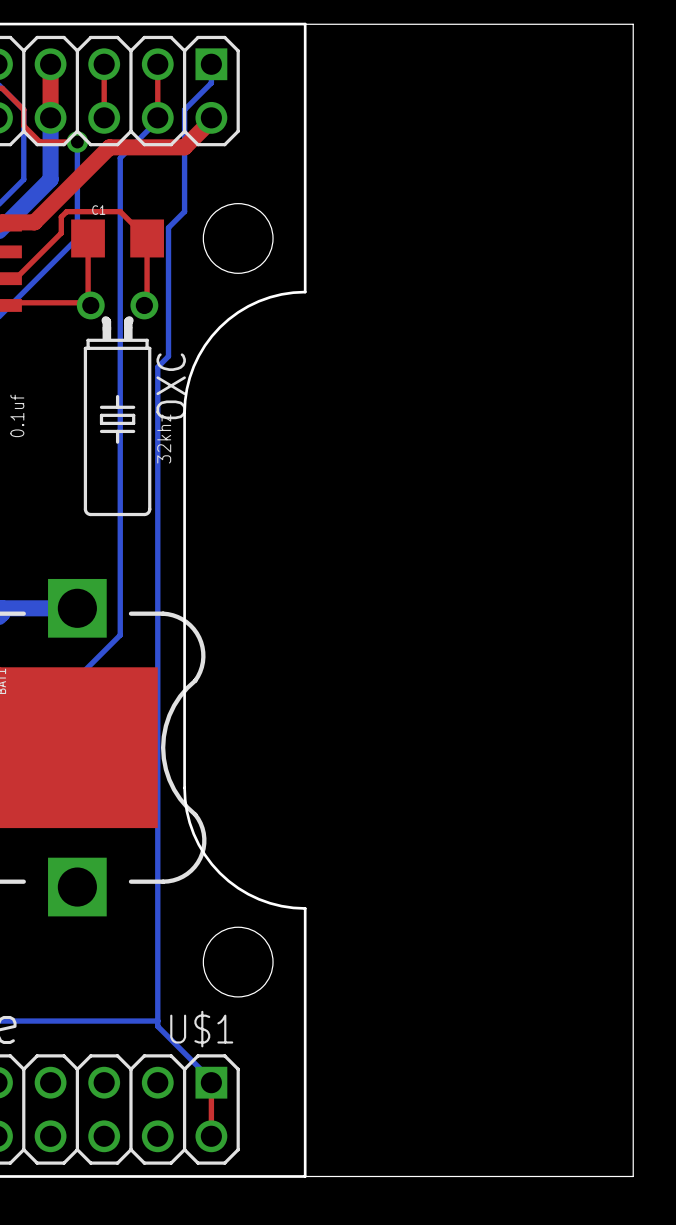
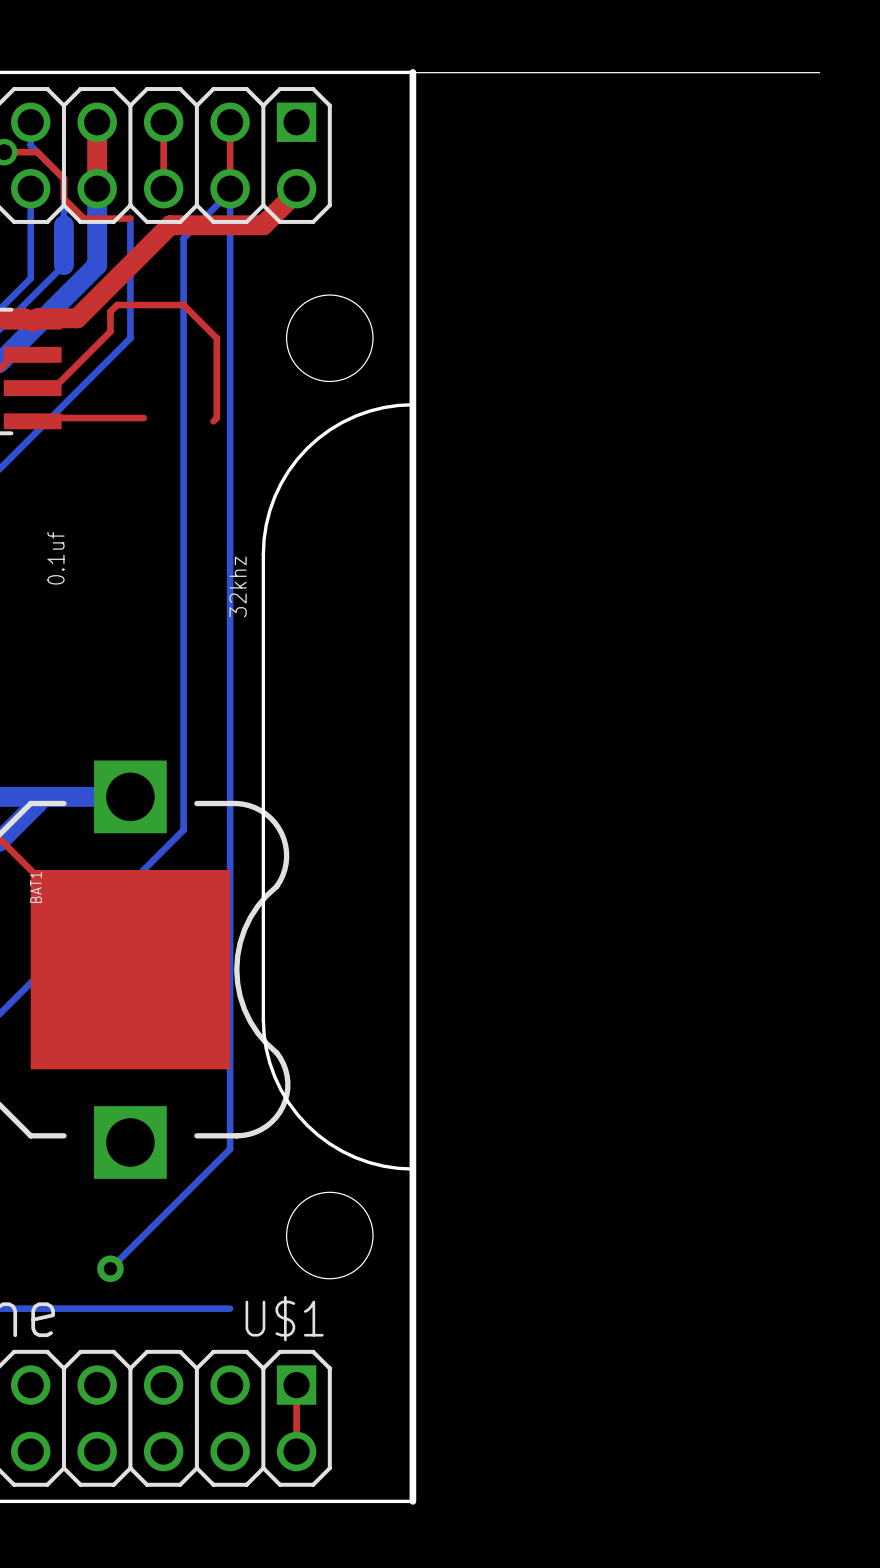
board edge: (633, 24) (633, 1176) (305, 1176) -> (412, 72) (412, 1501)
bottom track: (211, 64) (211, 83) (184, 109) (184, 211) (168, 227) (168, 356) (157, 367) -> (230, 192) (230, 497)
via: (77, 141) -> none
bottom track width: thin (23, 147) (23, 179) -> thick (63, 225) (63, 265)
top track: (88, 238) (88, 302) (90, 305) -> none
C1: (117, 238) -> none
OXC: (117, 403) -> none
bottom track: (157, 892) (157, 1026) (211, 1080) (211, 1082) -> (230, 1149) (110, 1268)
via: none -> (110, 1268)

